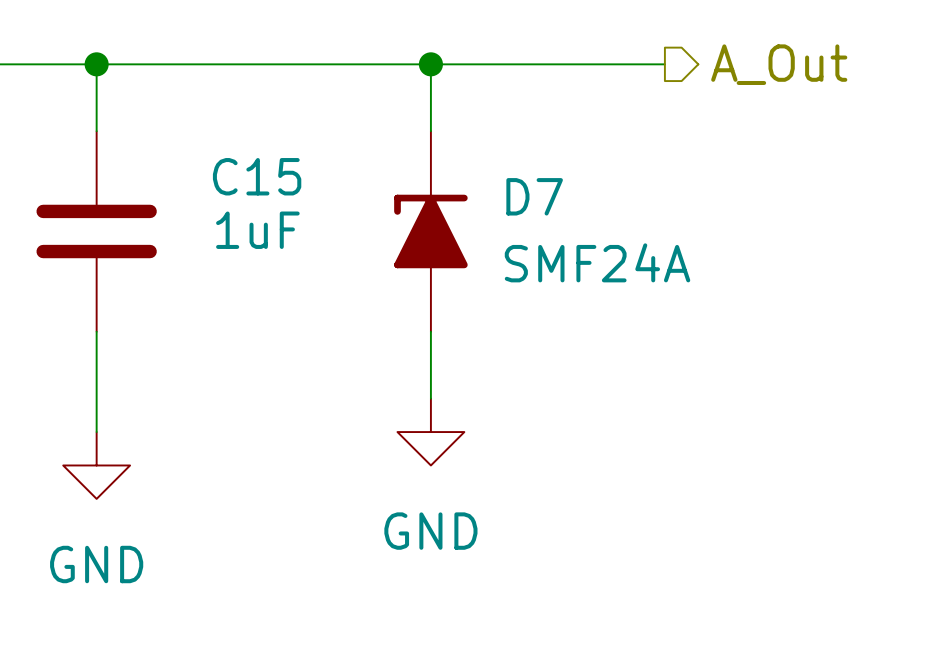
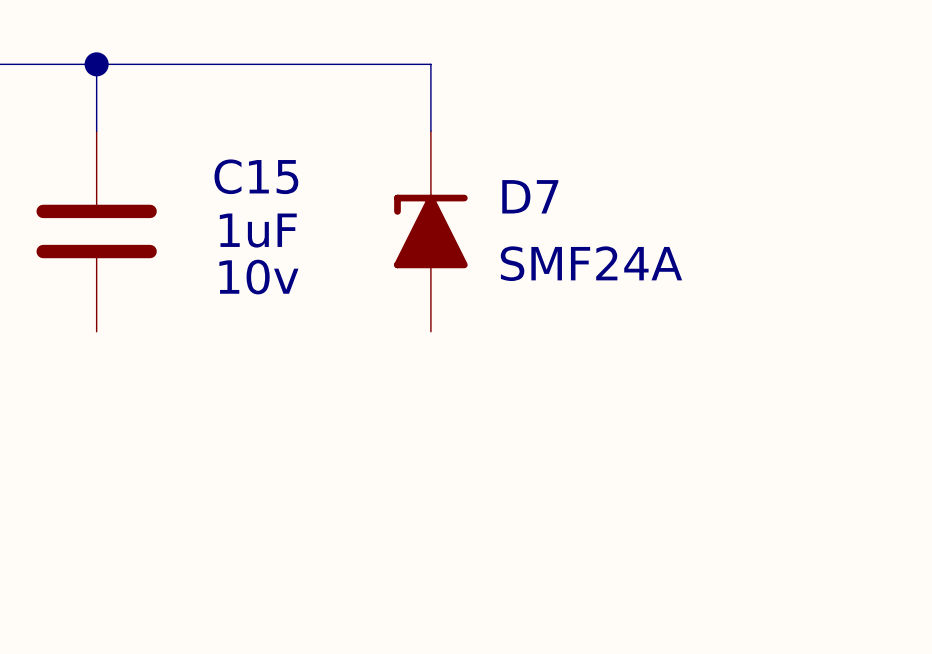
wire: (430, 64) (664, 64) -> none
junction: (430, 64) -> none
hierarchical label: A_Out (779, 64) -> none
C15 text: none -> 10v (258, 277)
wire: (96, 331) (96, 432) -> none
wire: (430, 331) (430, 398) -> none
power symbol: GND (430, 432) -> none
power symbol: GND (96, 465) -> none

